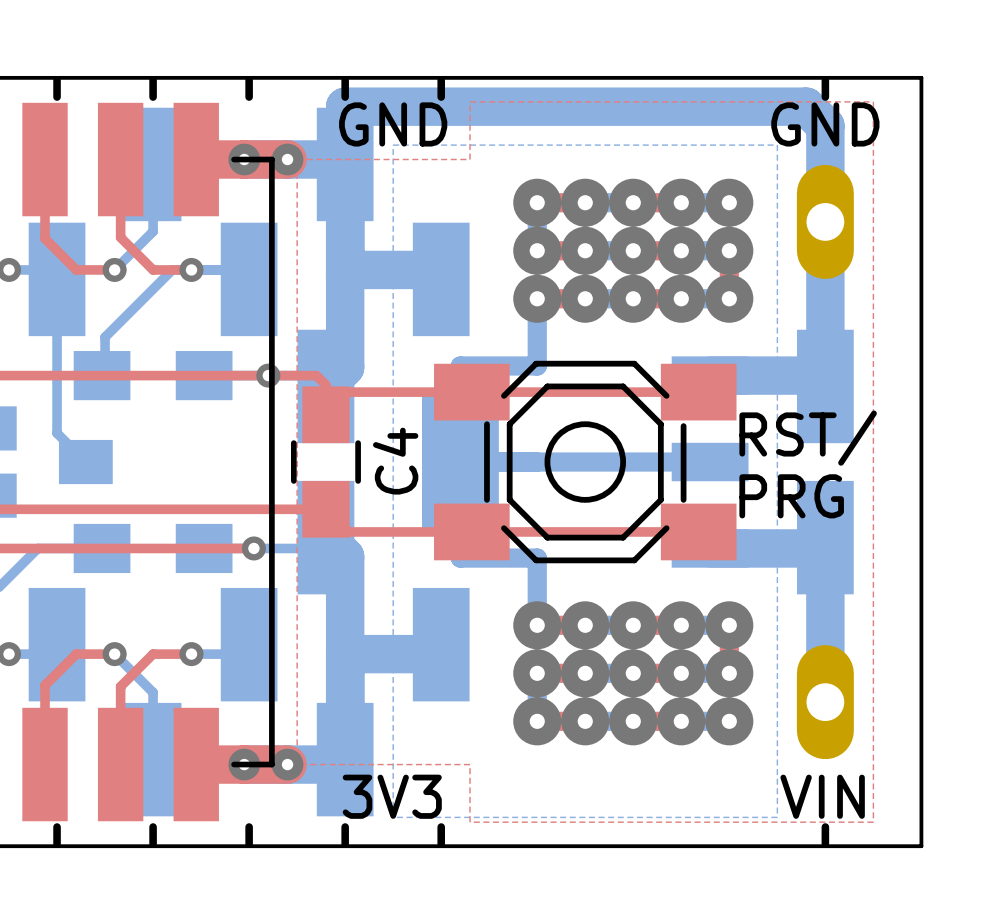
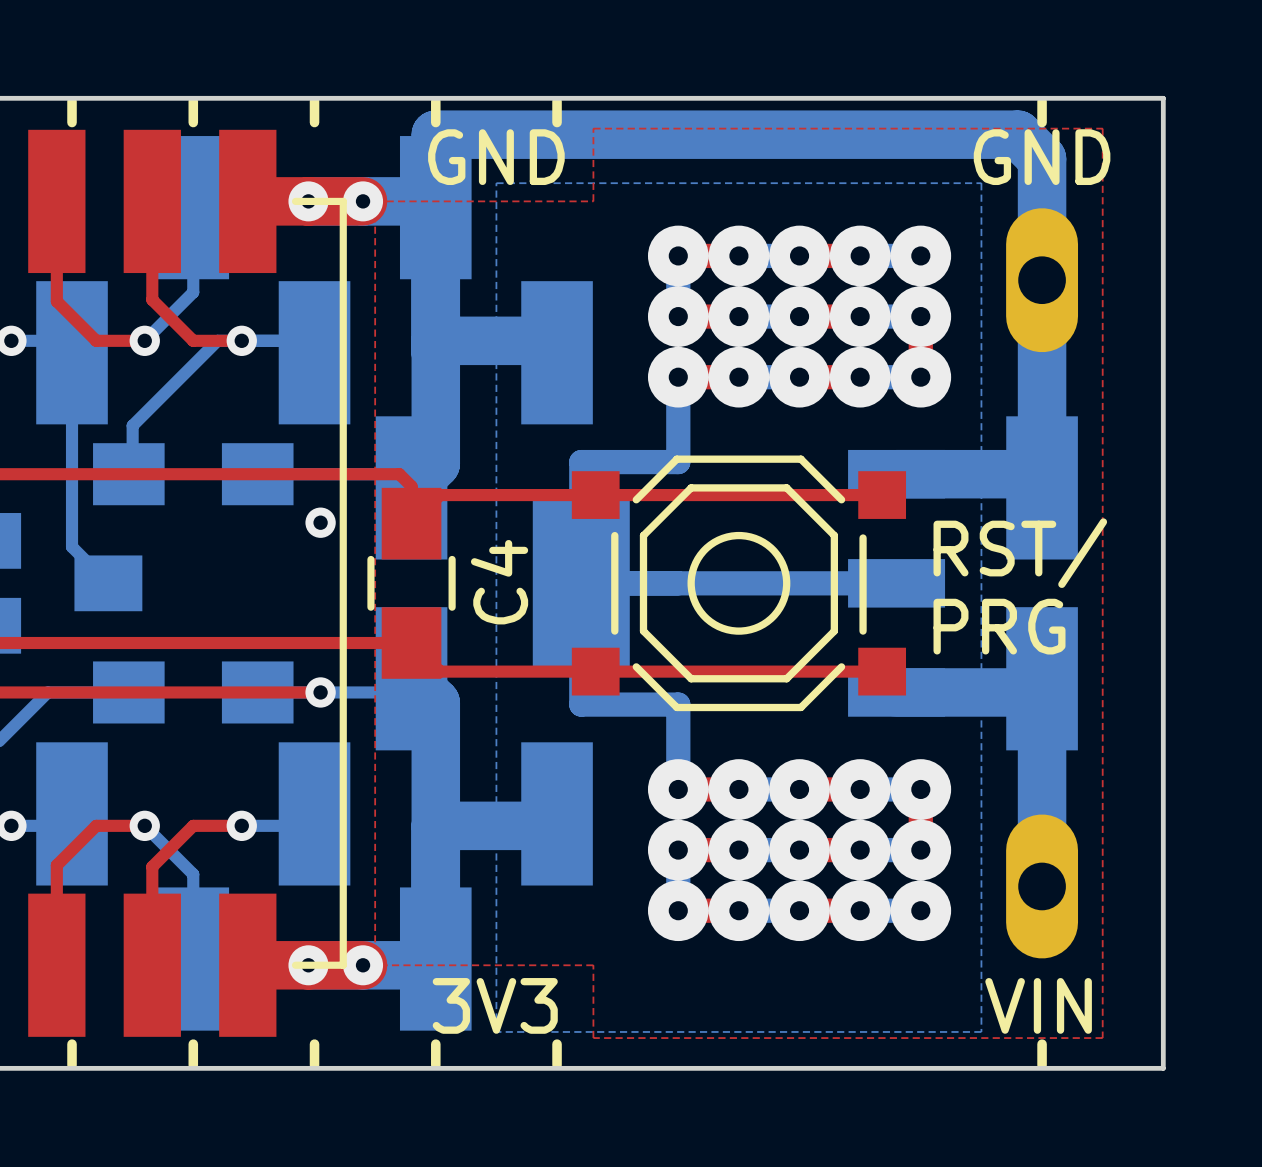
part footprint: [434, 360, 737, 564] -> [571, 455, 907, 712]
via position: (268, 375) -> (320, 522)

